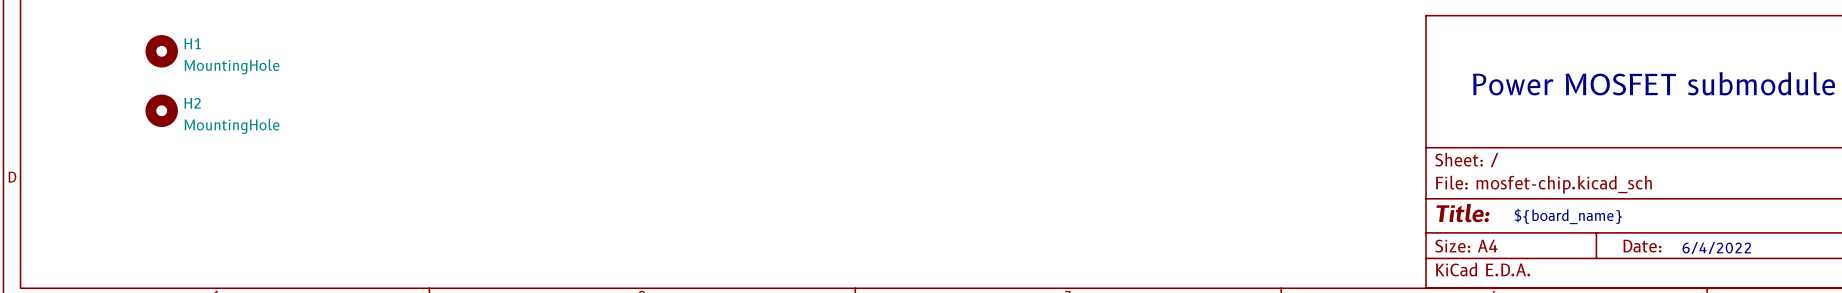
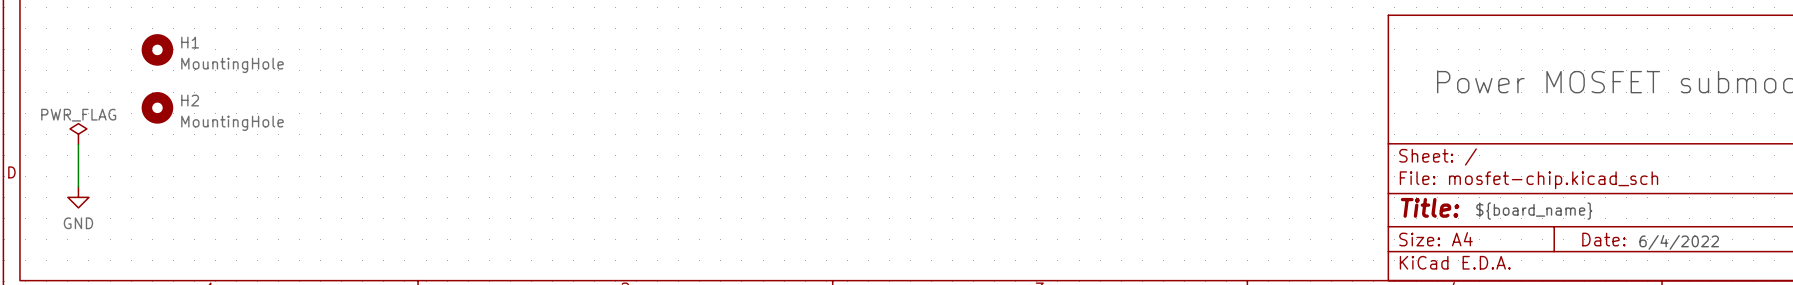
power symbol: none -> PWR_FLAG (78, 134)
wire: none -> (78, 144) (78, 186)
power symbol: none -> GND (78, 197)

